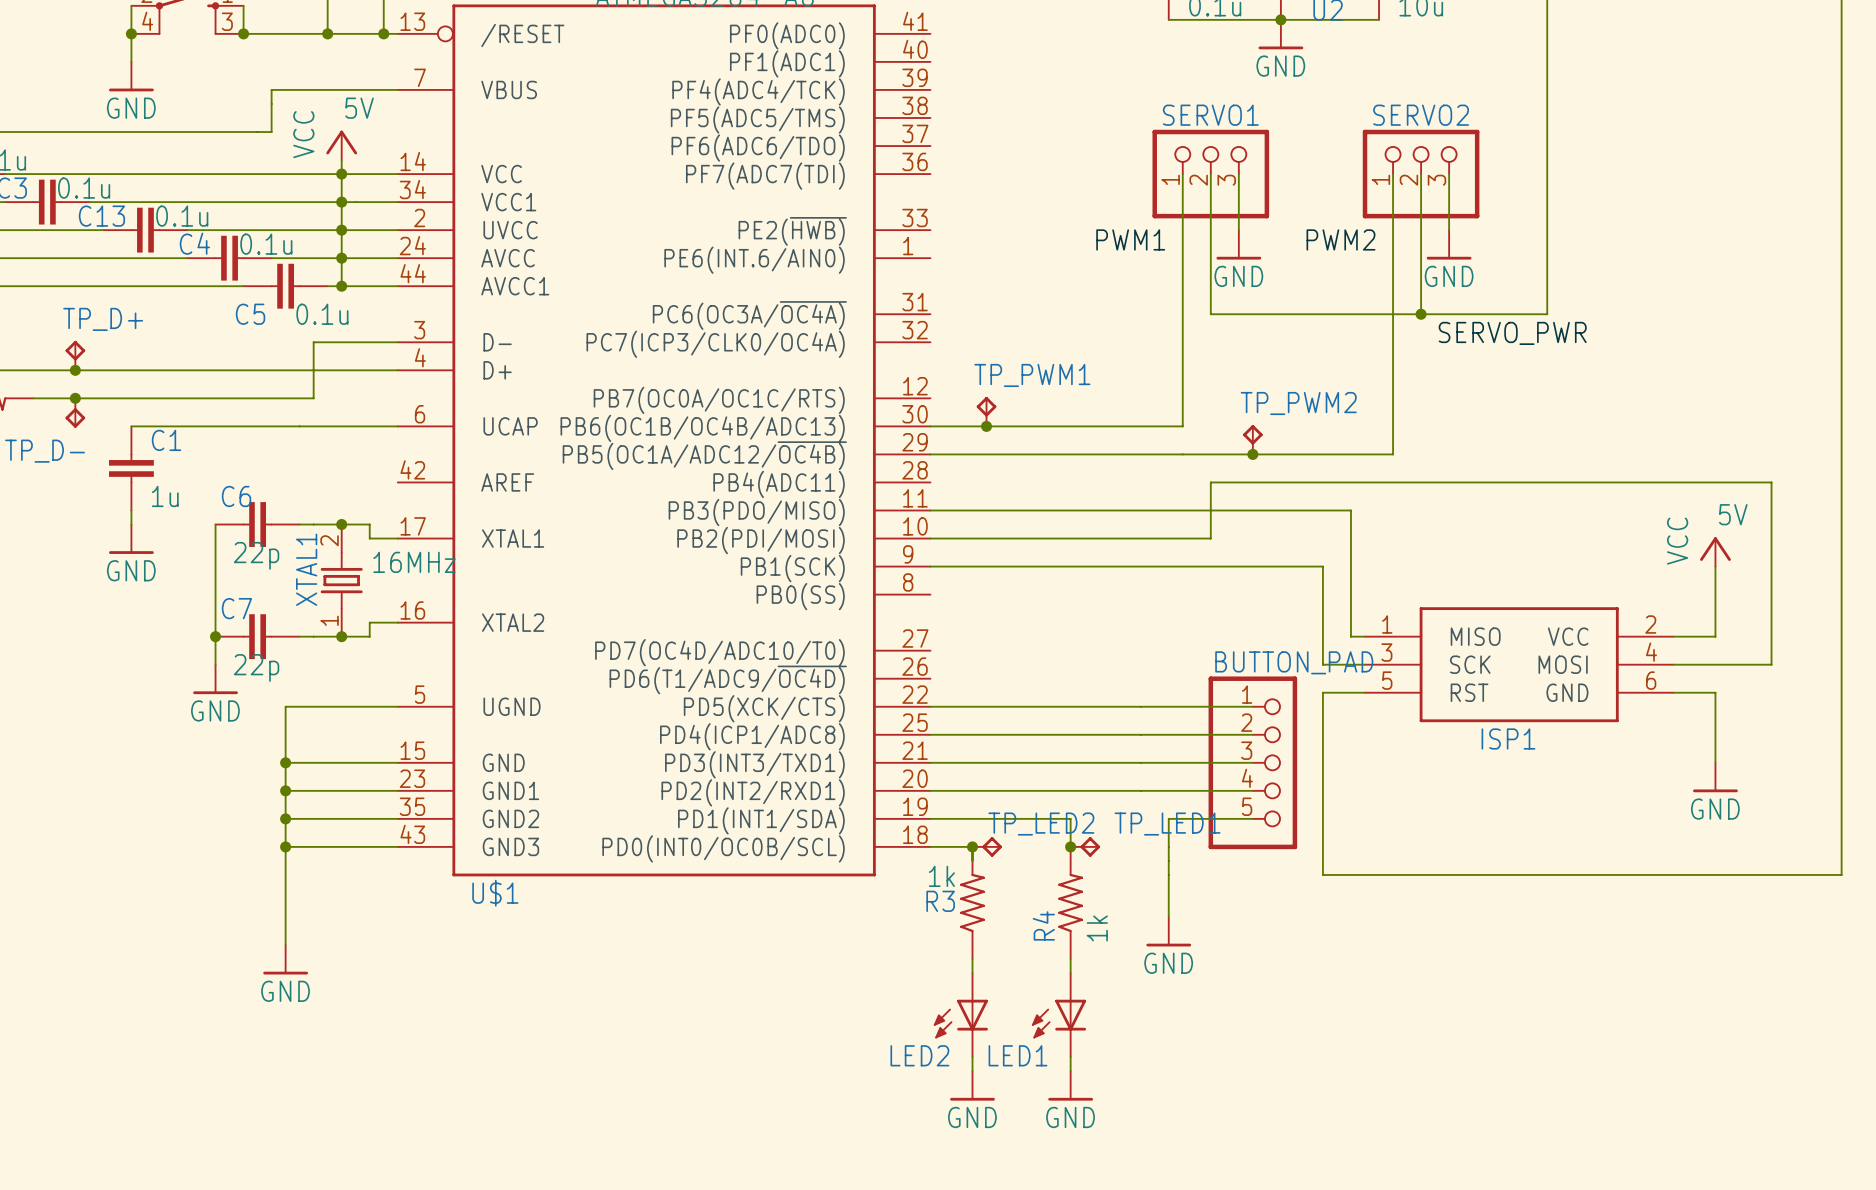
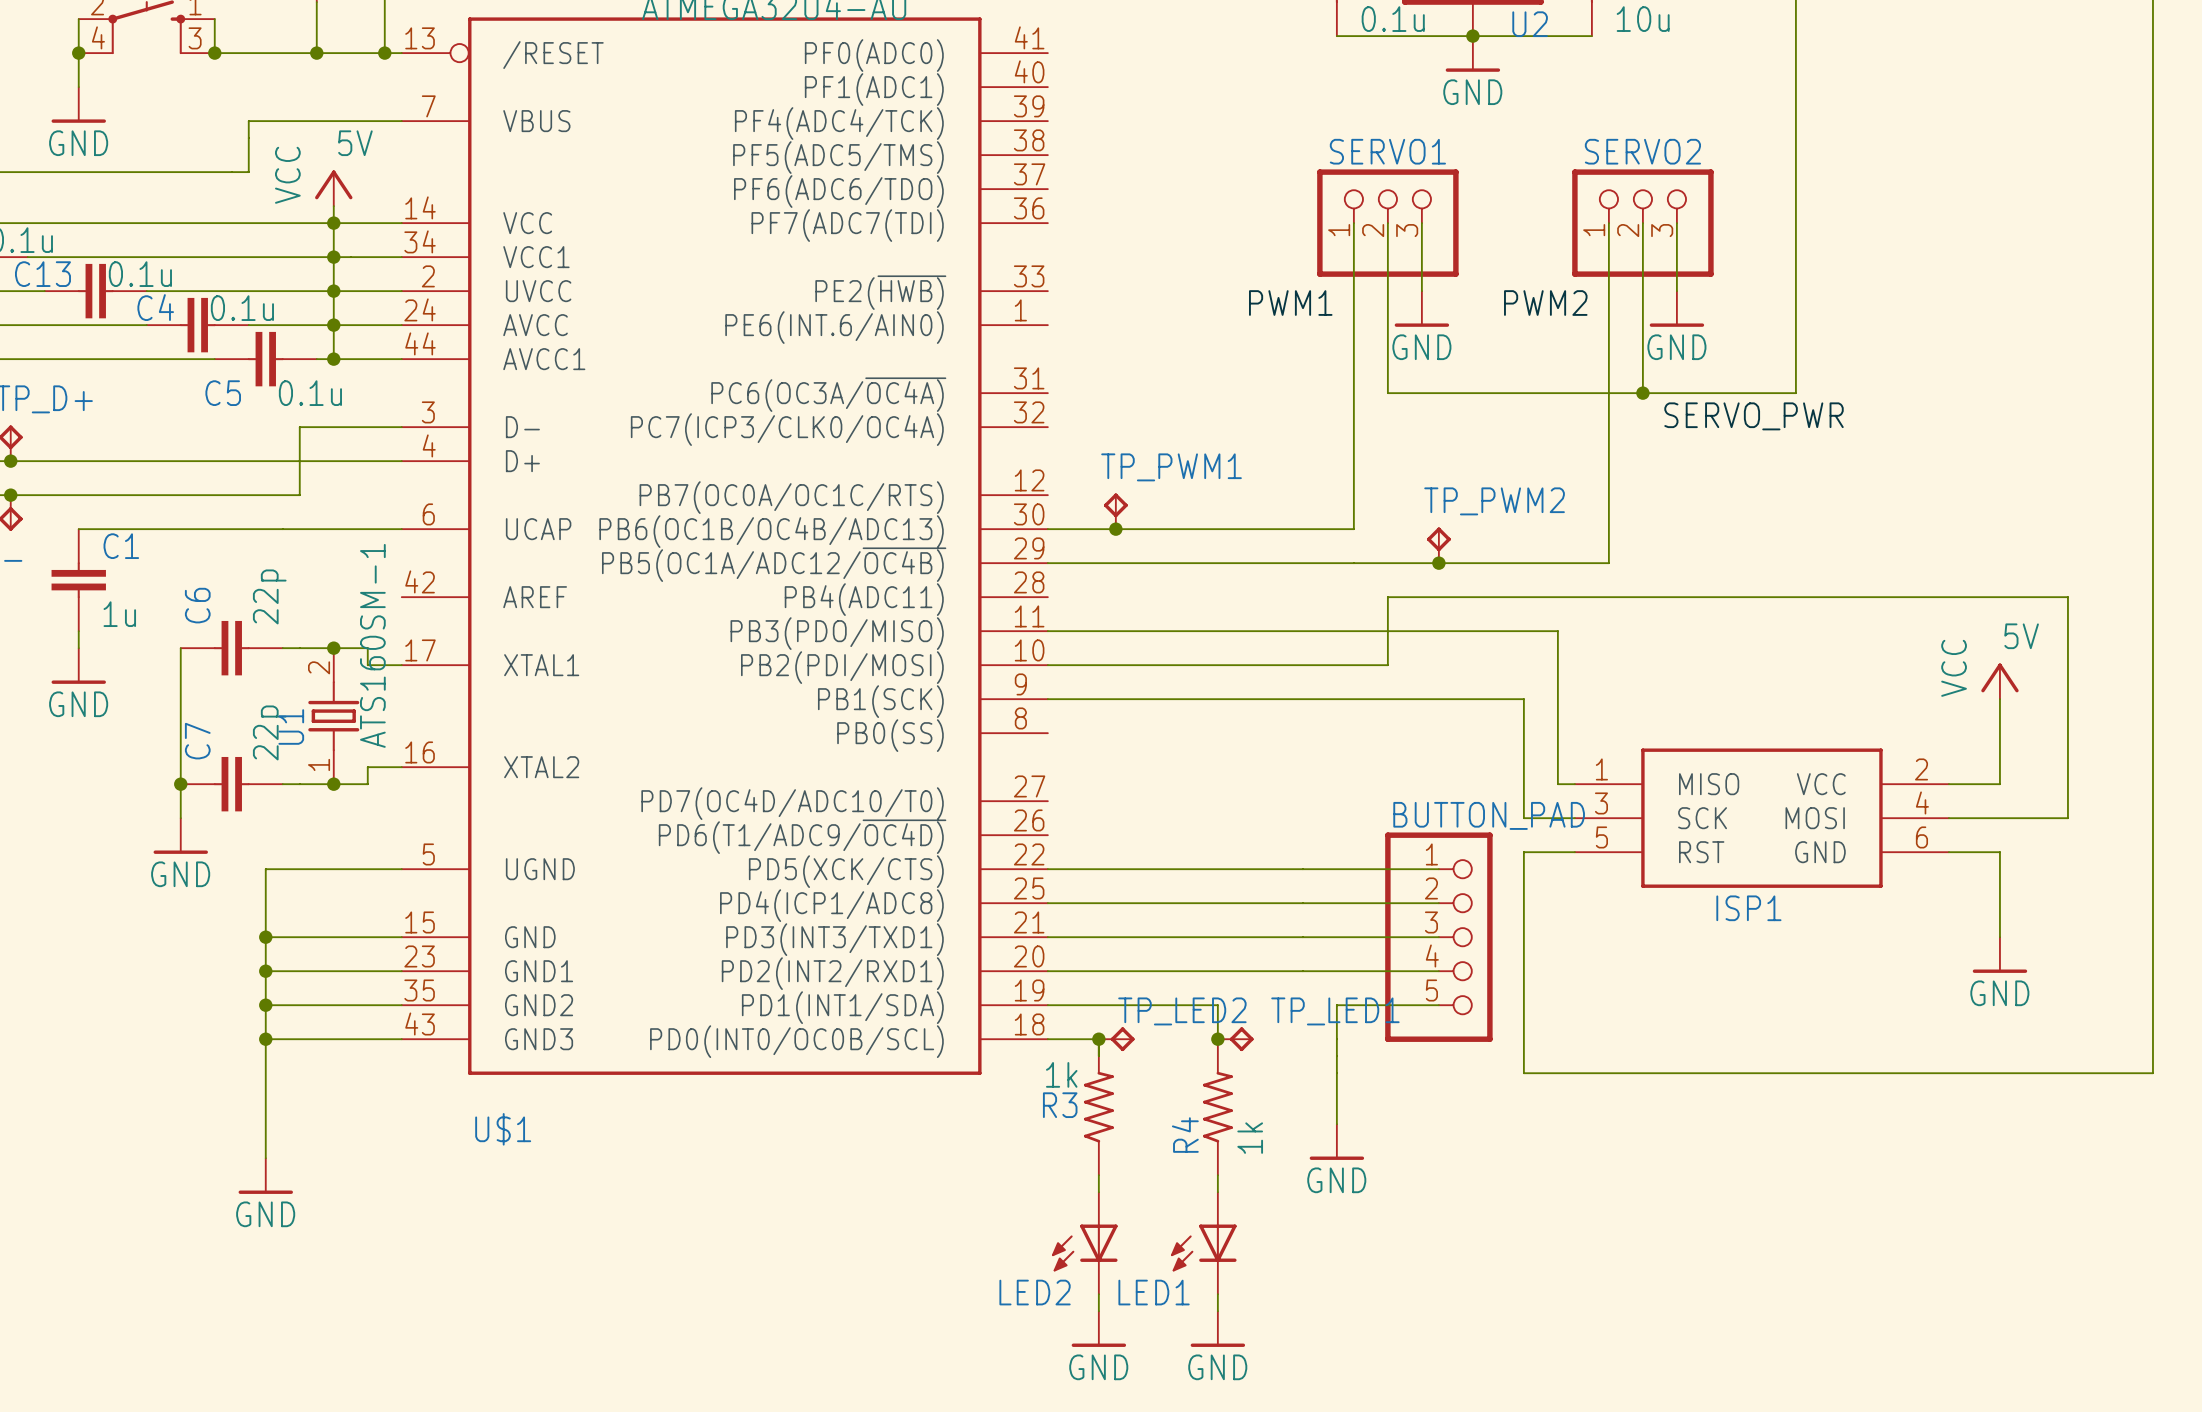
C6 name rotation: 0° (236, 496) -> 90° counterclockwise (197, 605)
C6 value rotation: 0° (256, 555) -> 90° counterclockwise (269, 596)
C6 value position: 22p (256, 555) -> 22p (269, 596)
XTAL1 value: 16MHz (414, 562) -> ATS160SM-1 (372, 645)
XTAL1 name: XTAL1 (306, 569) -> U1 (291, 726)
C7 name rotation: 0° (236, 608) -> 90° counterclockwise (197, 741)
C7 value rotation: 0° (256, 667) -> 90° counterclockwise (269, 732)
C7 value position: 22p (256, 667) -> 22p (269, 732)
U$1 name position: U$1 (495, 893) -> U$1 (503, 1129)

